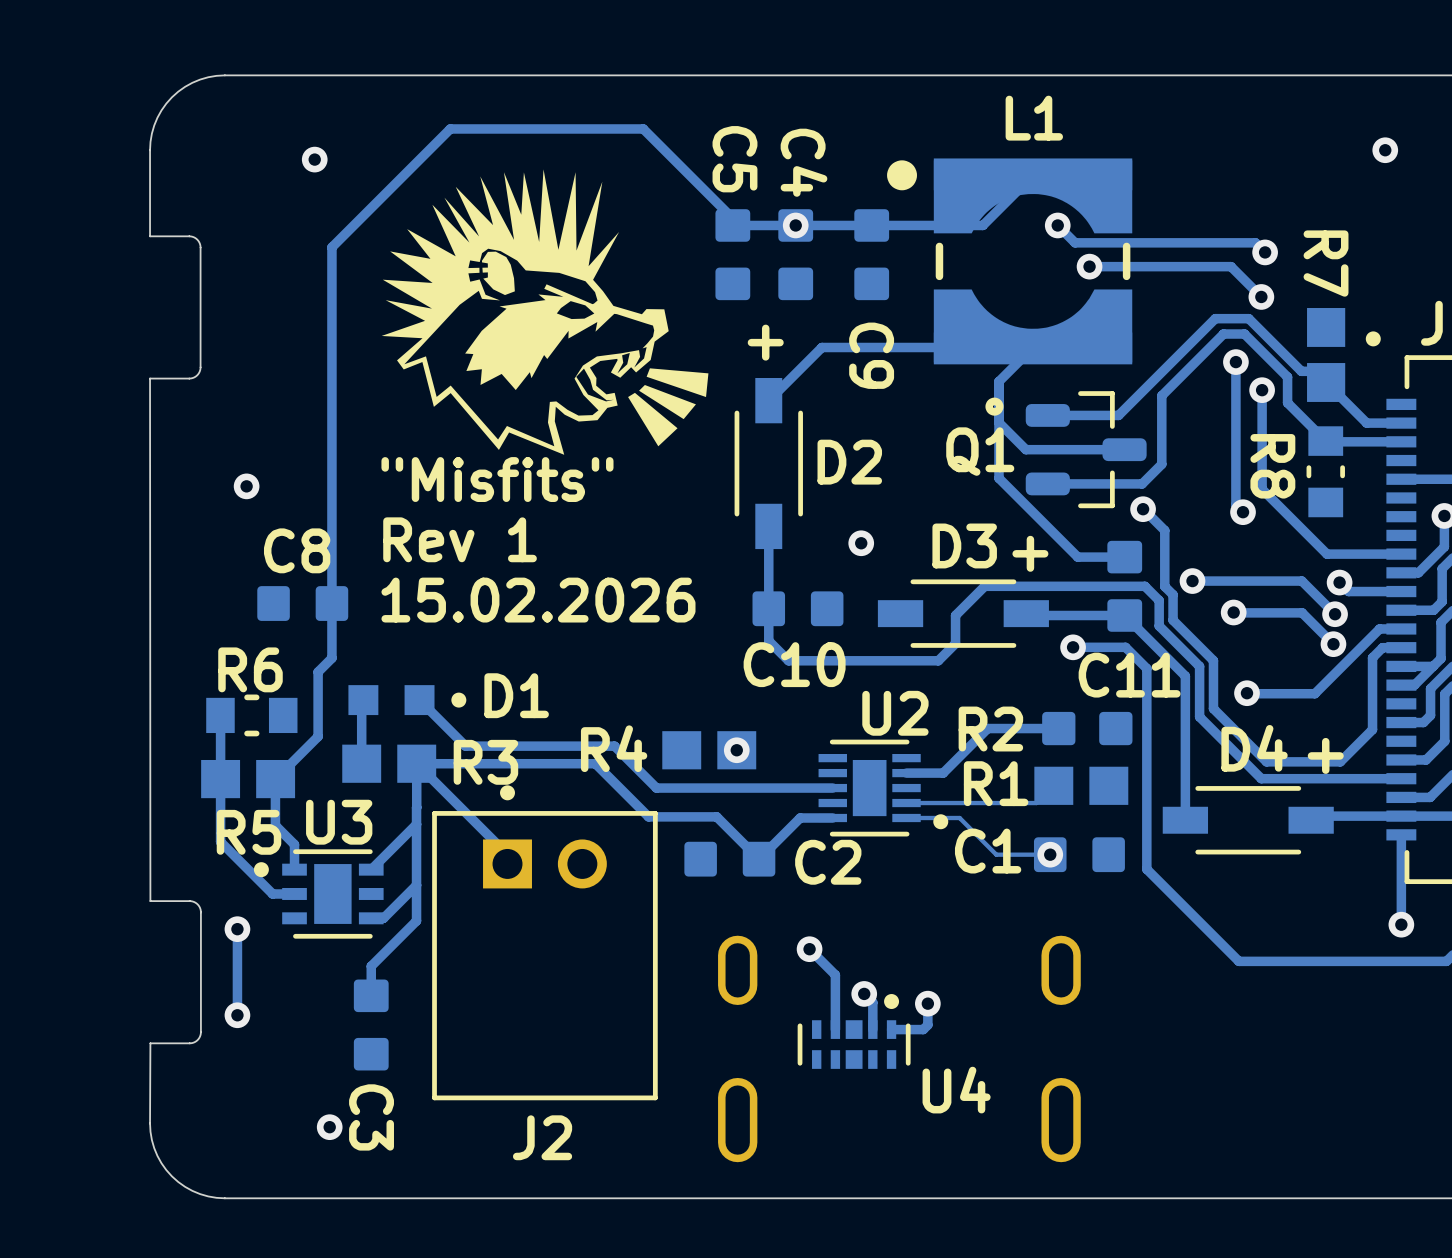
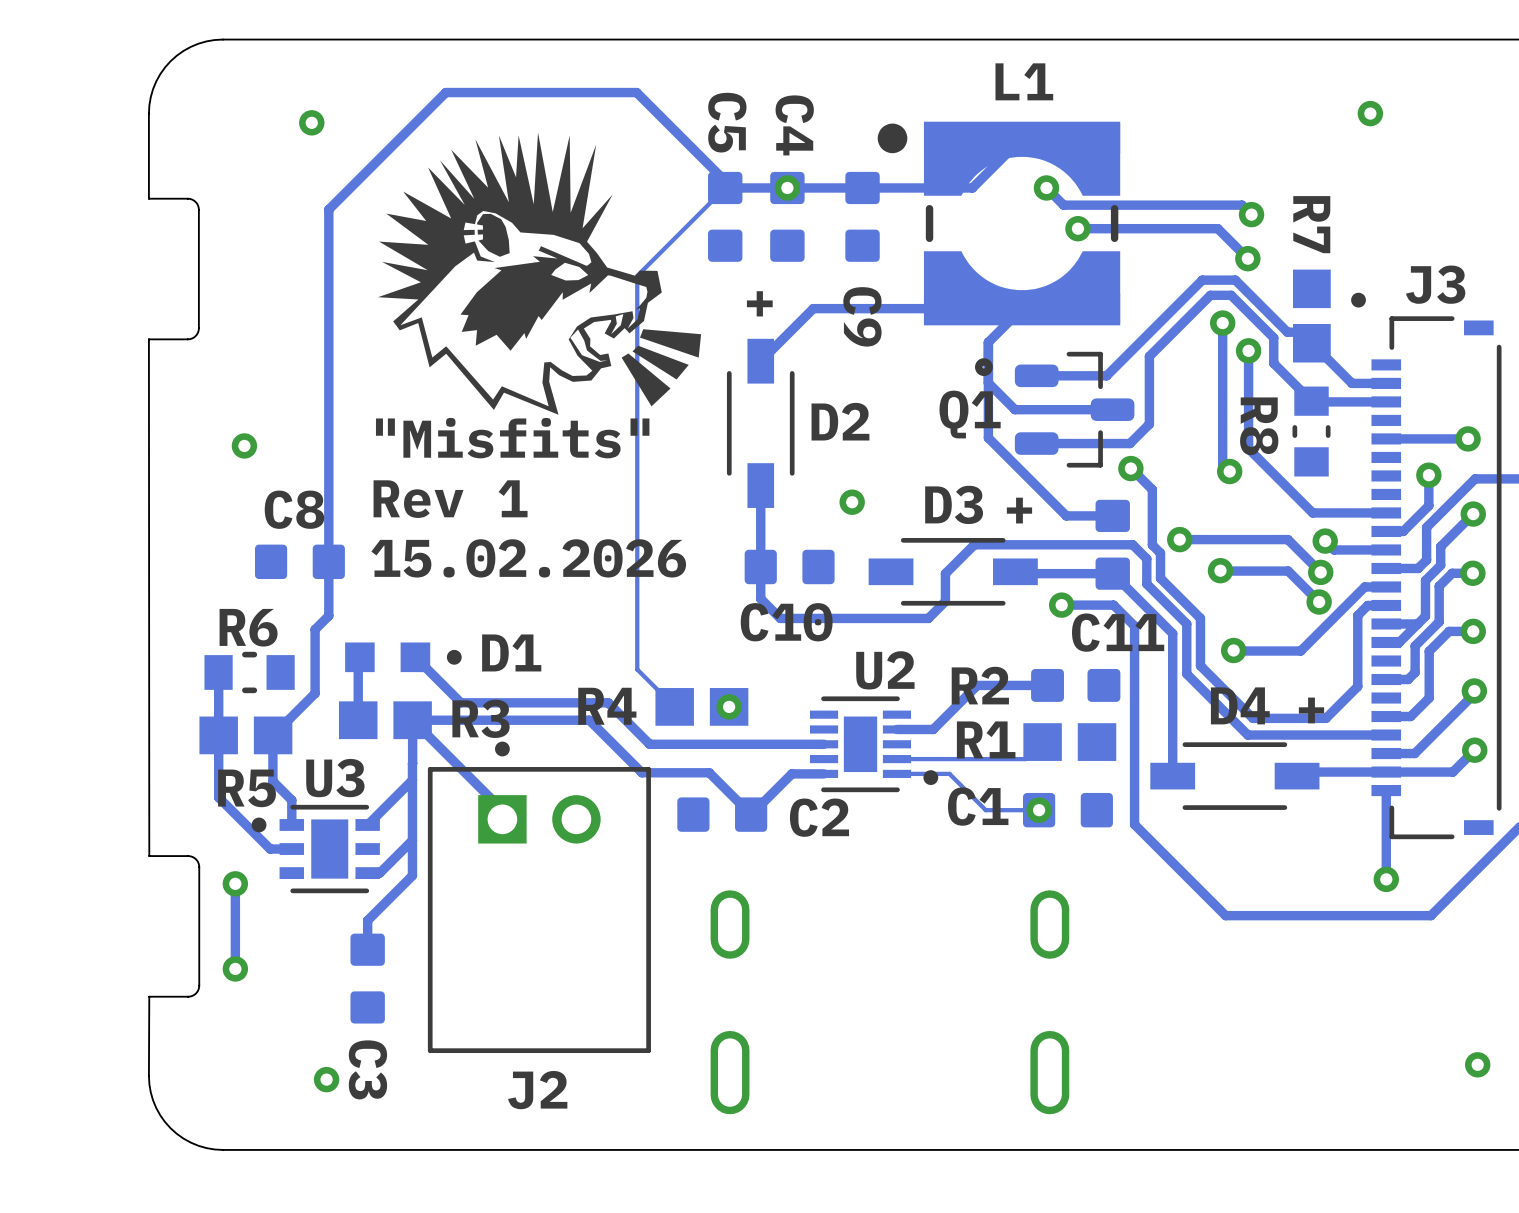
track: none -> (725, 187) (637, 275) (637, 669) (674, 706)
track: (809, 949) (835, 975) (835, 1029) -> none
via: (809, 949) -> none
track: (864, 993) (872, 1002) (872, 1029) -> none
via: (864, 993) -> none
track: (927, 1003) (927, 1025) (923, 1029) (891, 1029) -> none
via: (927, 1003) -> none
U4: (854, 1031) -> none

